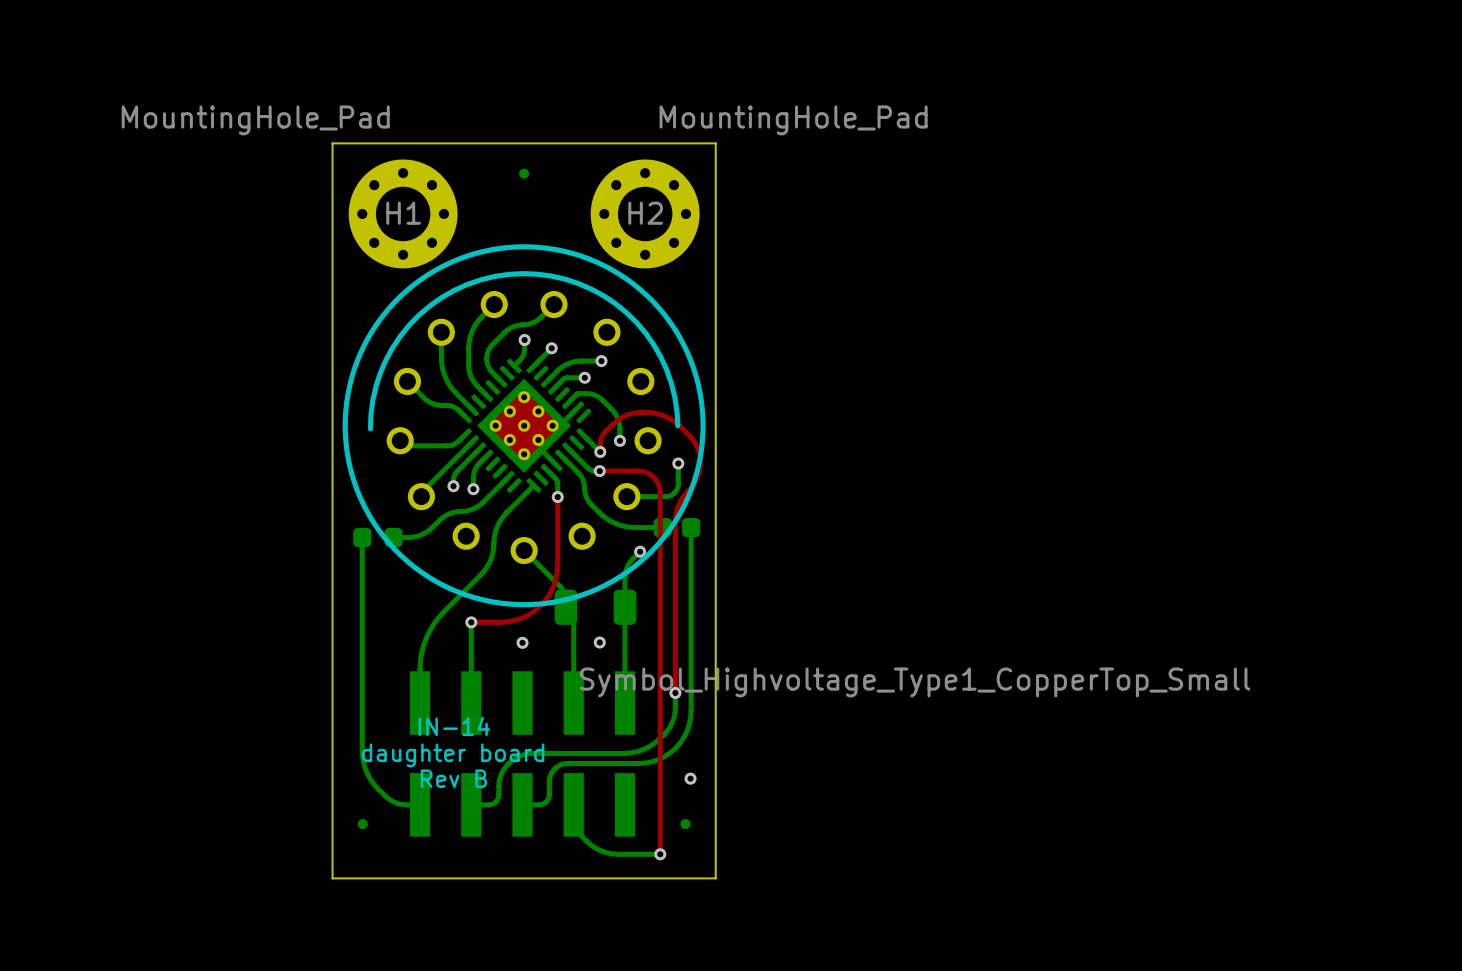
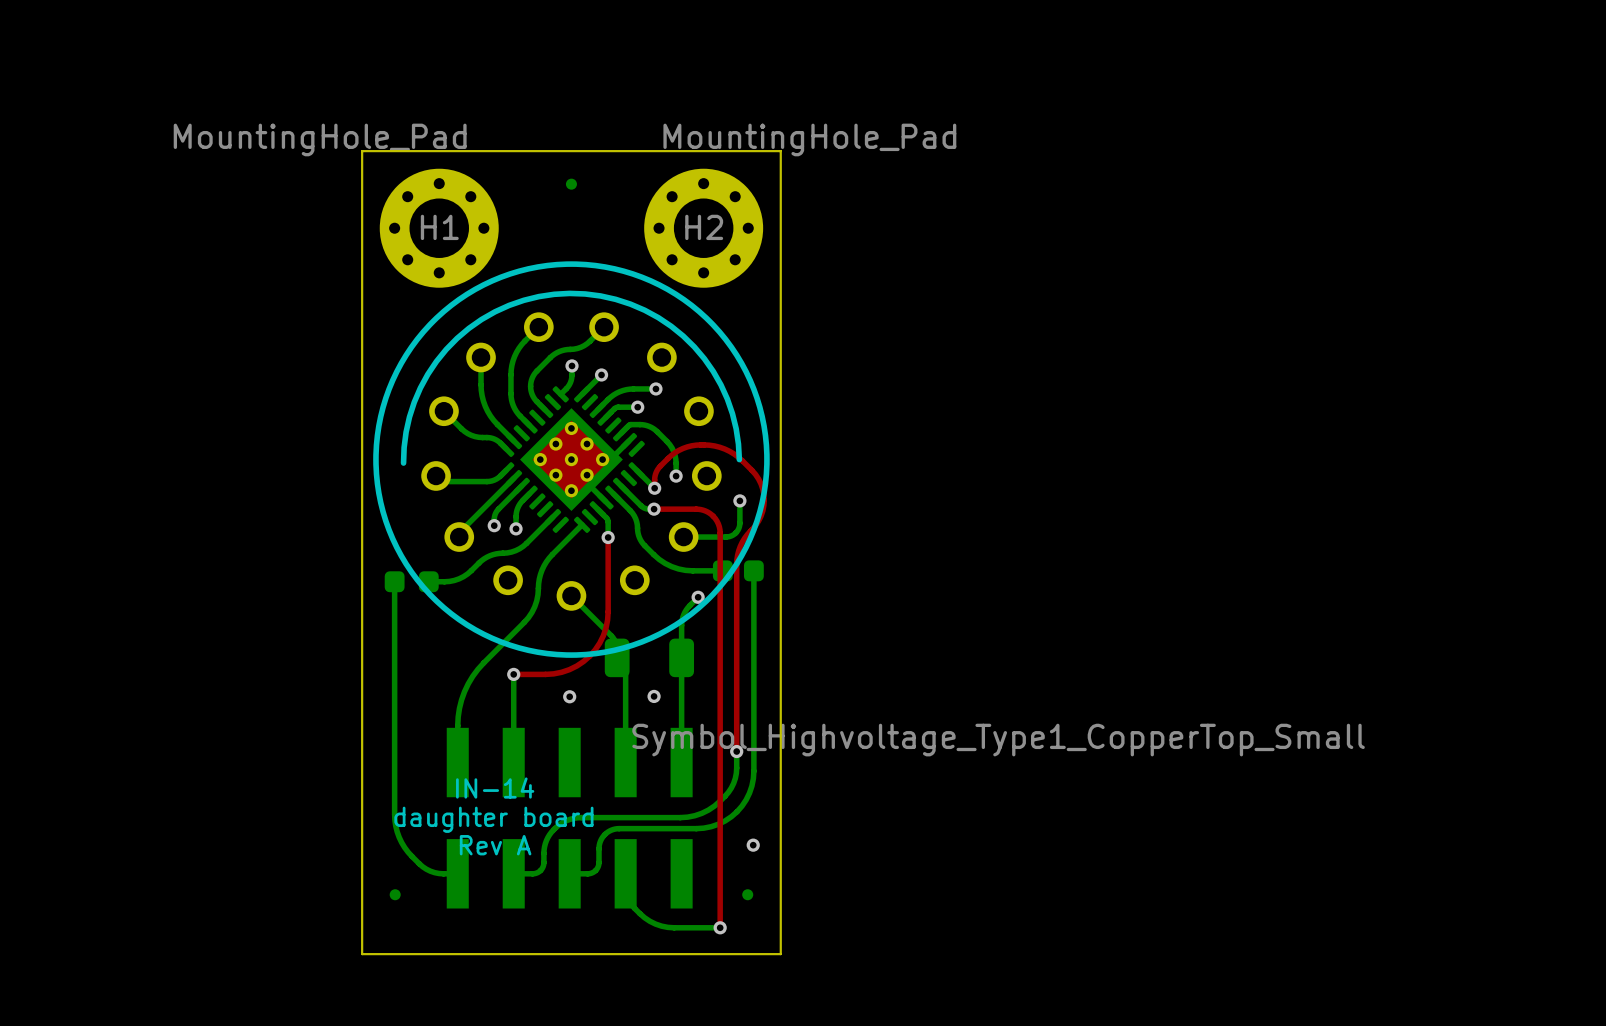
H1 value position: MountingHole_Pad (255, 120) -> MountingHole_Pad (320, 139)
H2 value position: MountingHole_Pad (793, 120) -> MountingHole_Pad (809, 139)
text: Rev B (453, 778) -> Rev A (495, 845)

